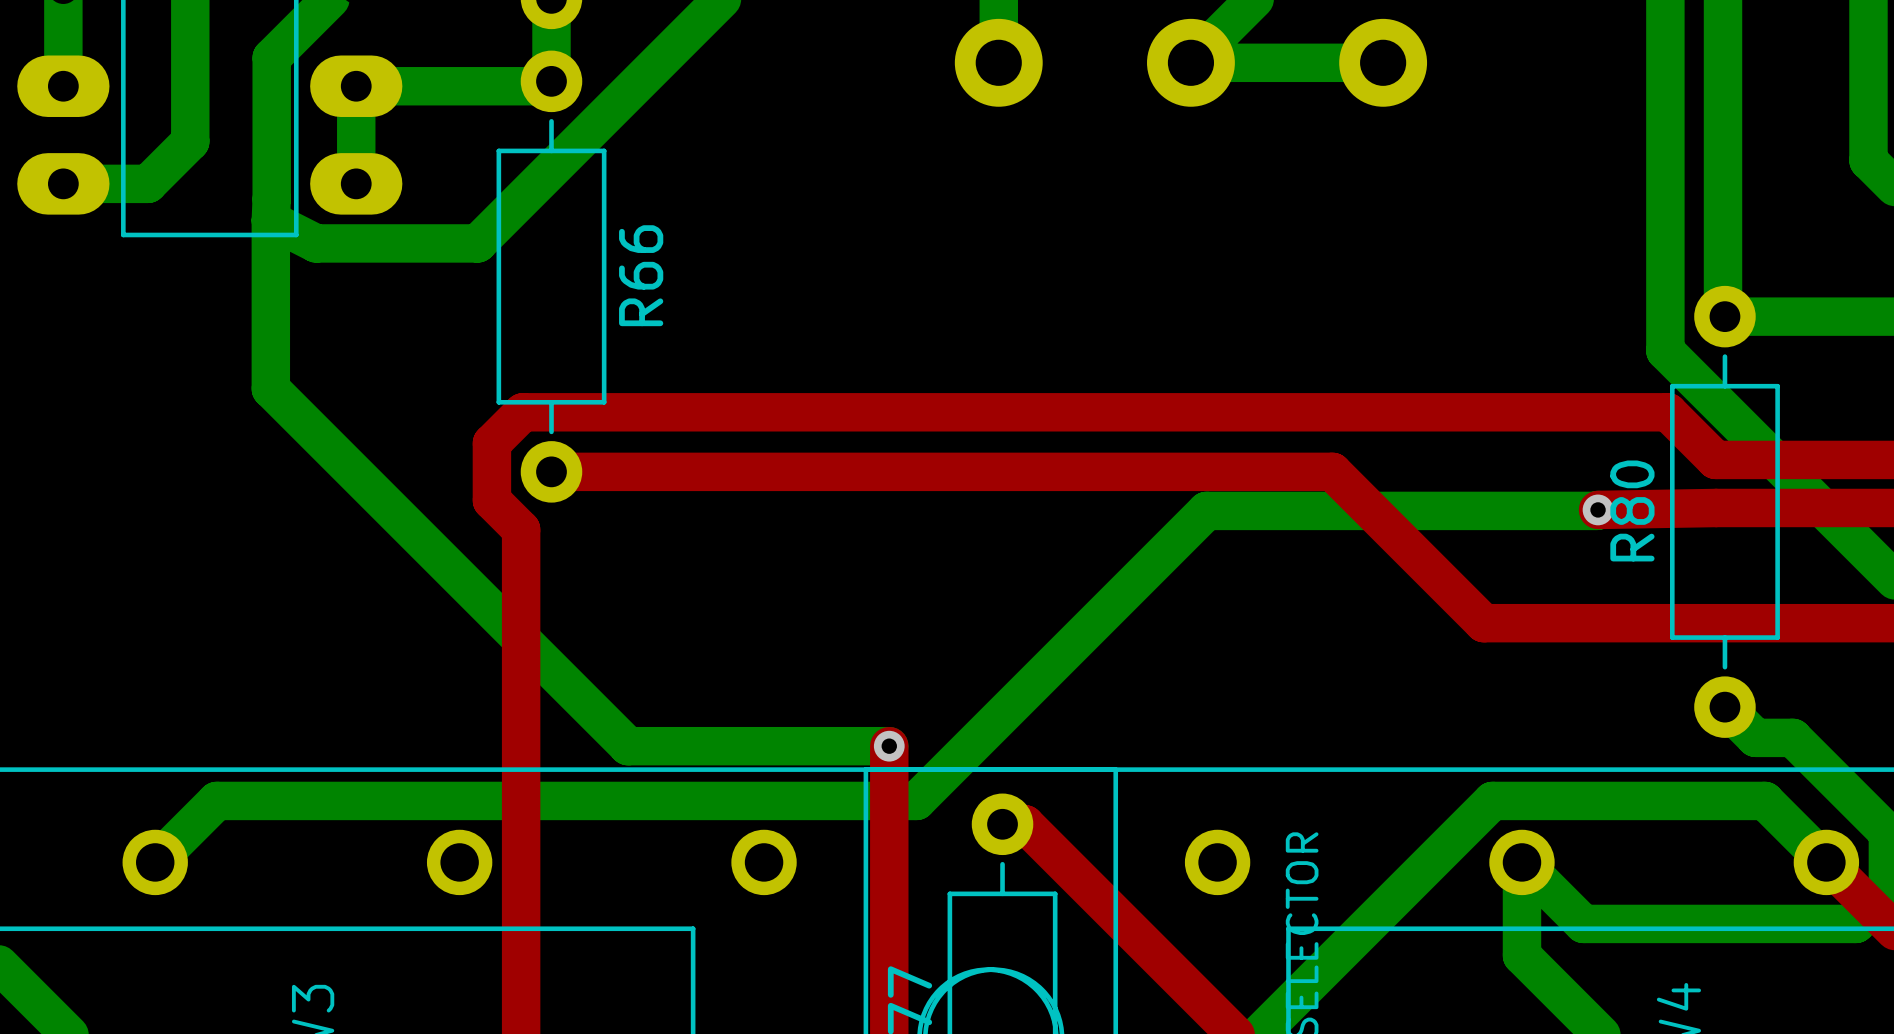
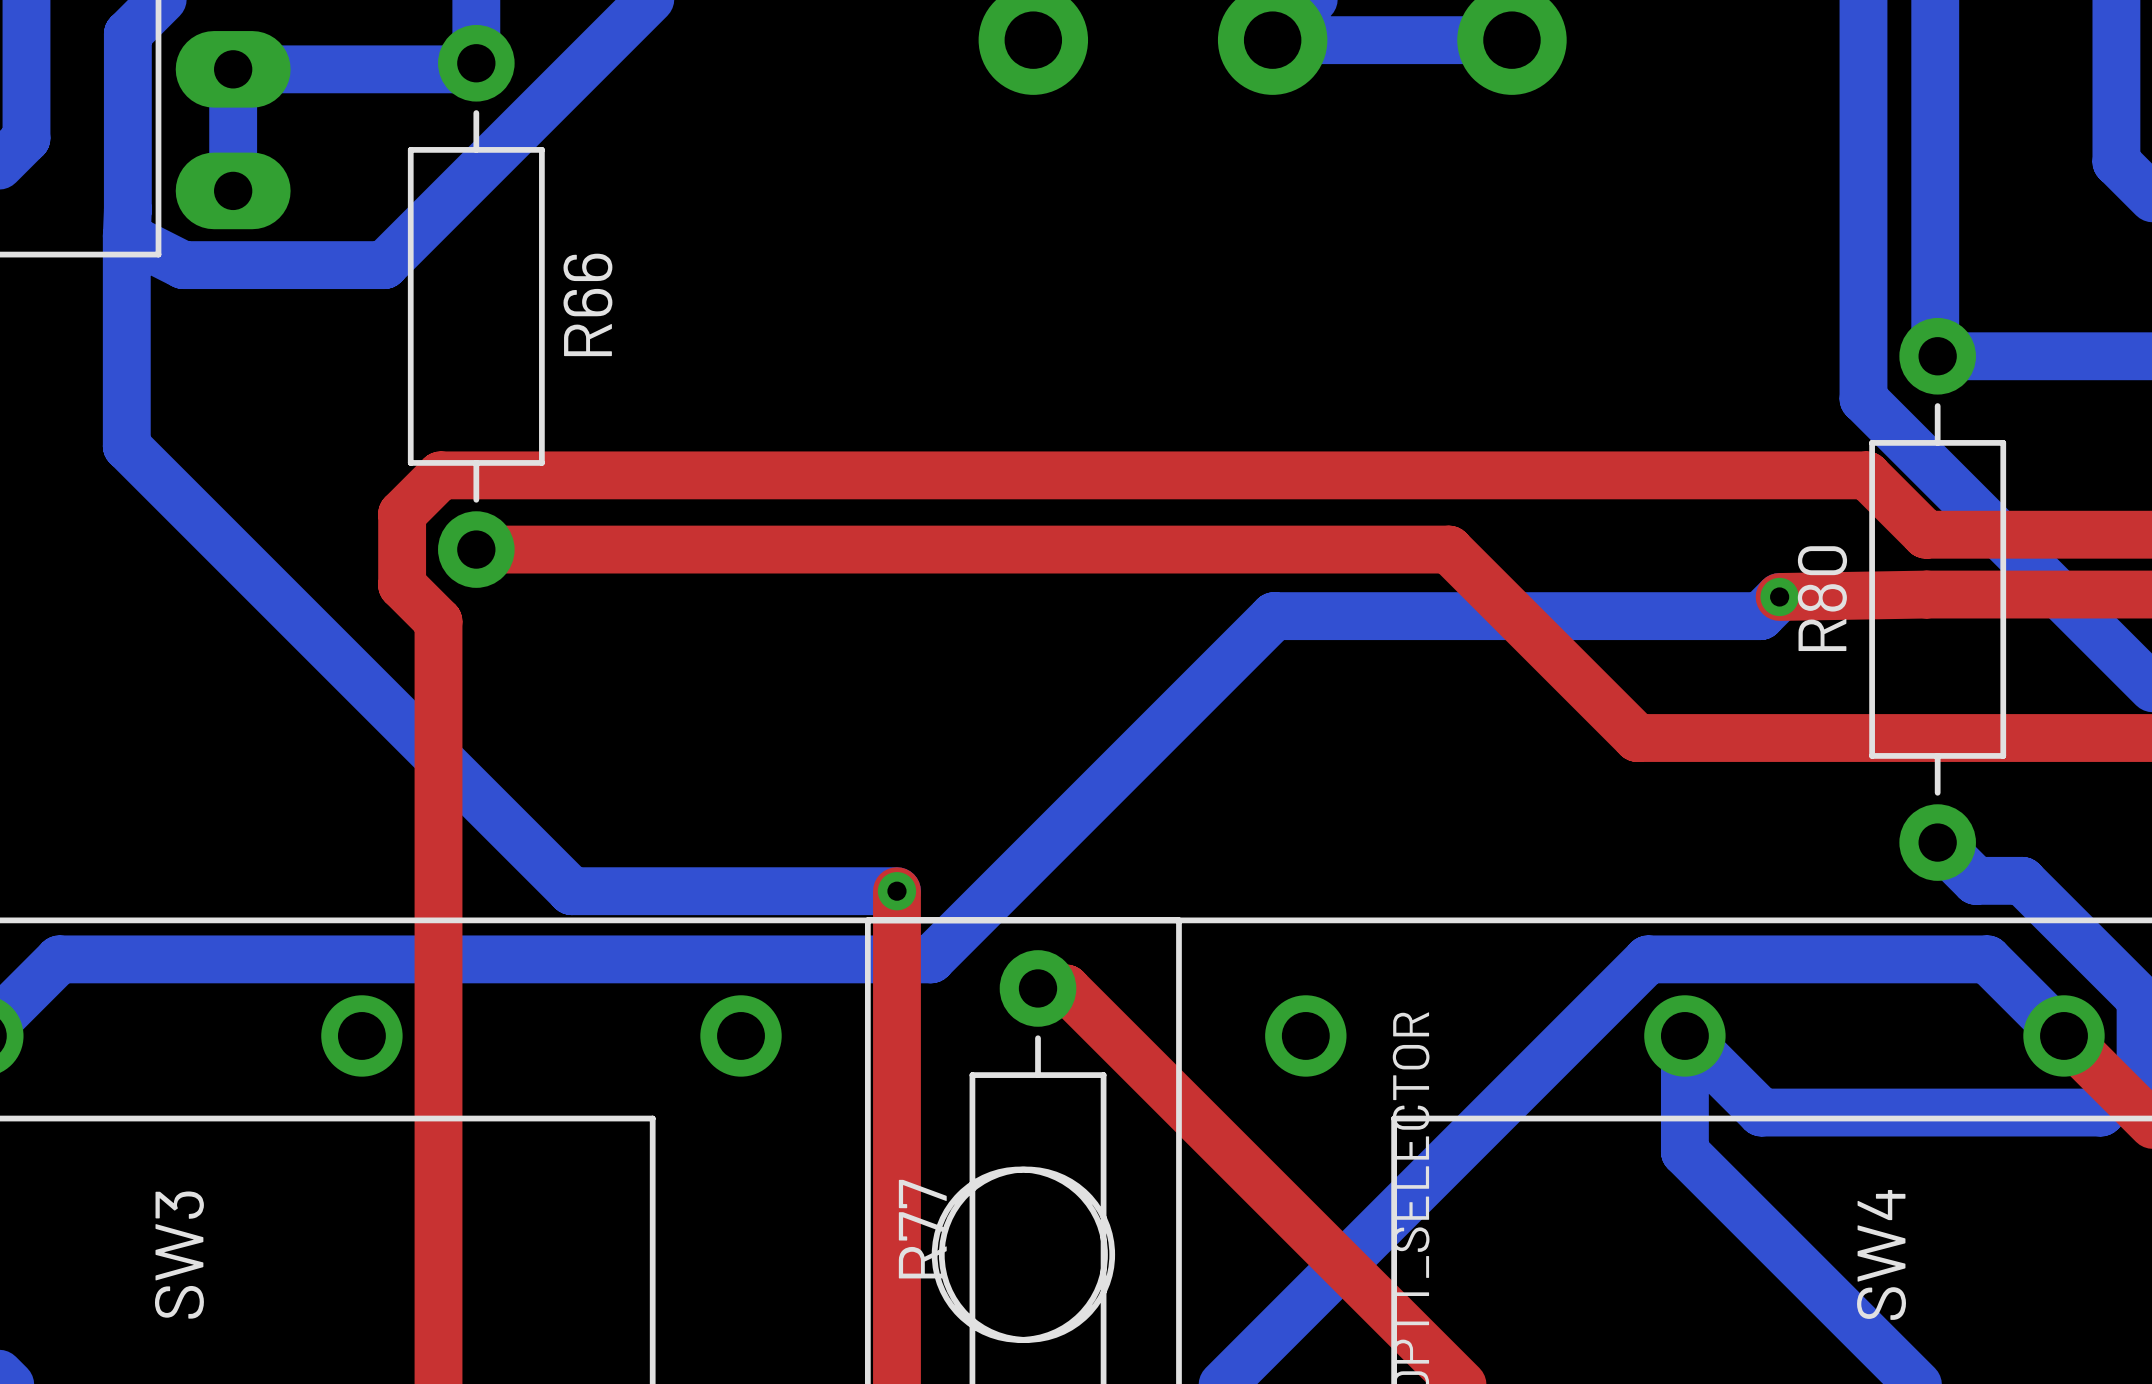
bottom track: (1597, 510) (1206, 510) (1192, 525) -> (1778, 598) (1760, 616) (1274, 616)

